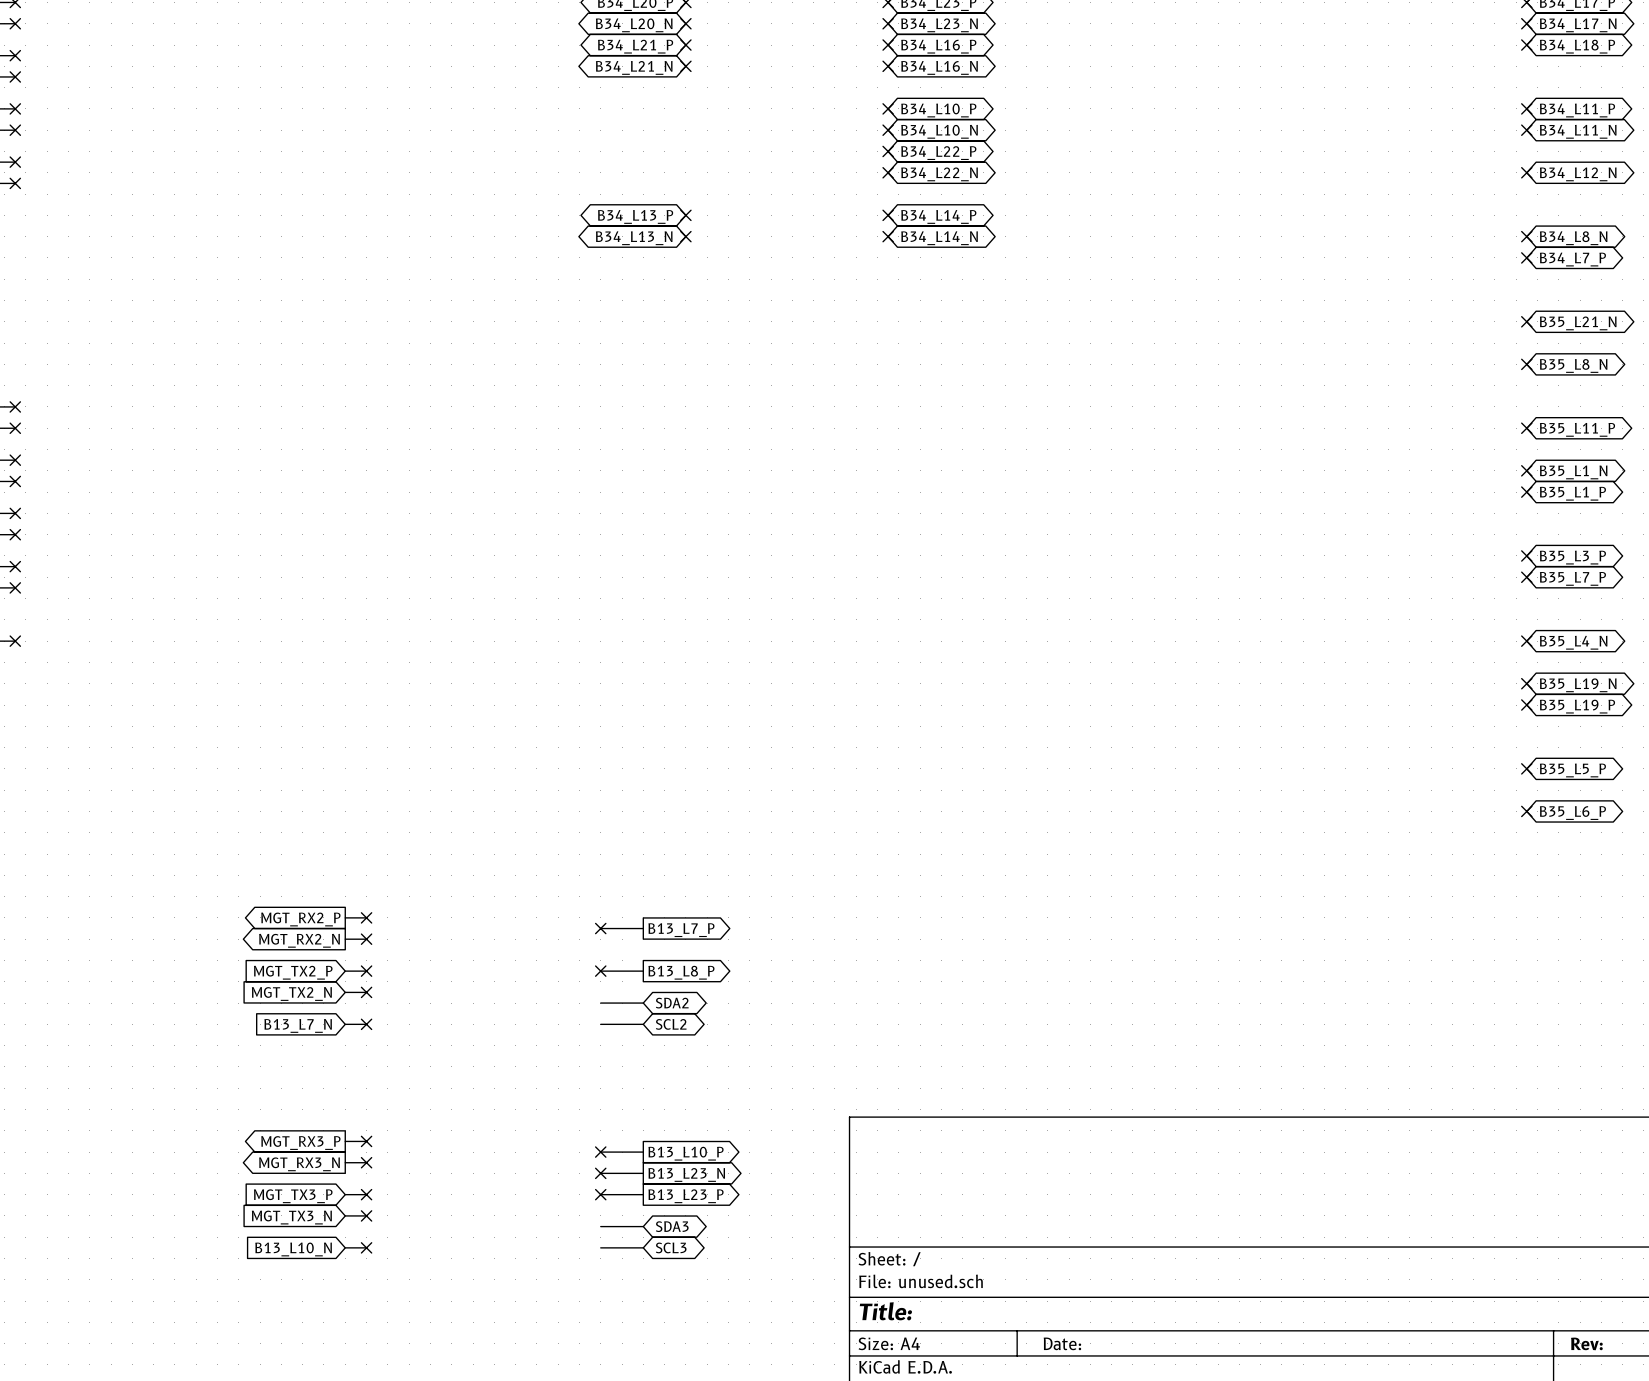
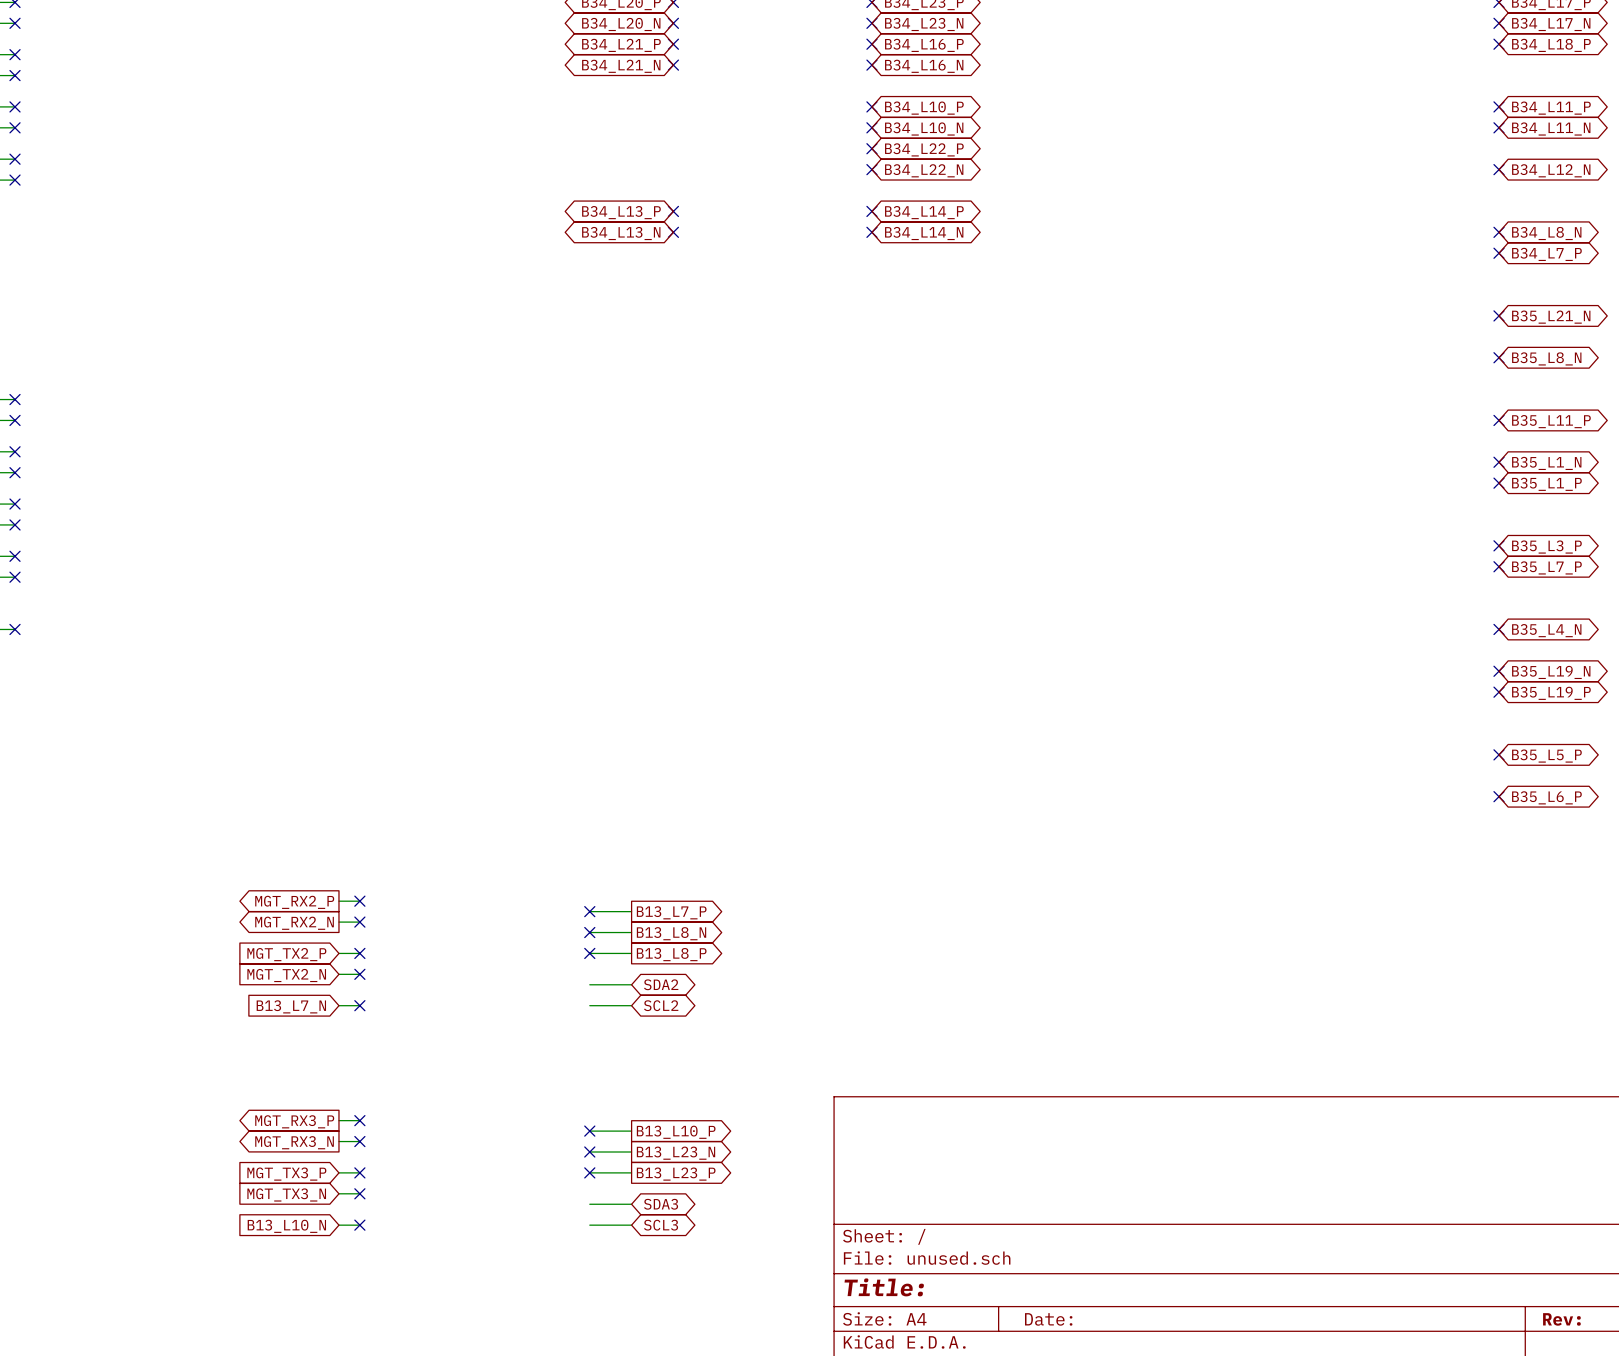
wire: none -> (589, 932) (631, 932)
no-connect mark: none -> (589, 932)
global label: none -> B13_L8_N (671, 933)

